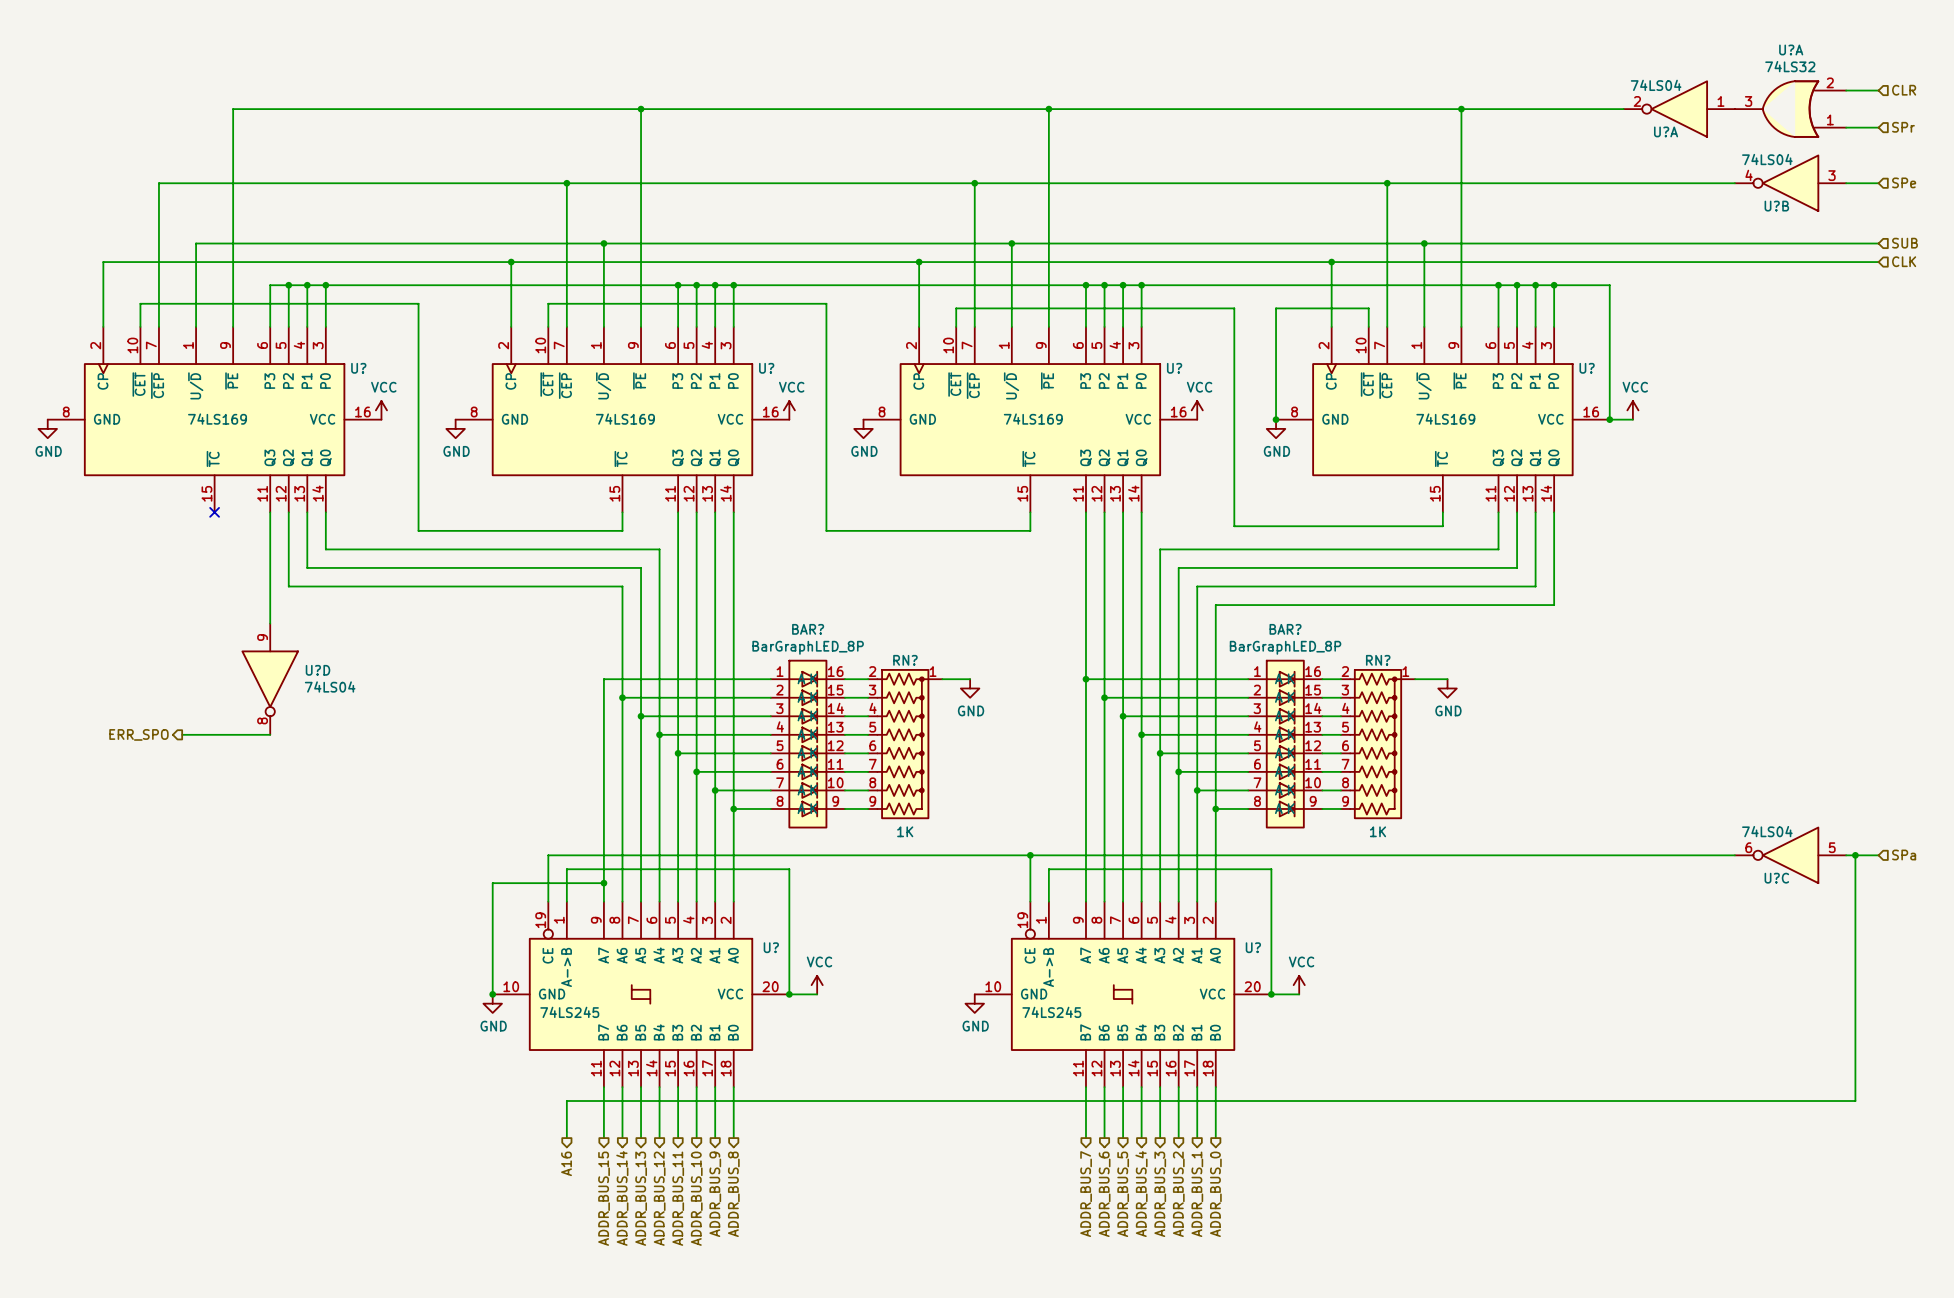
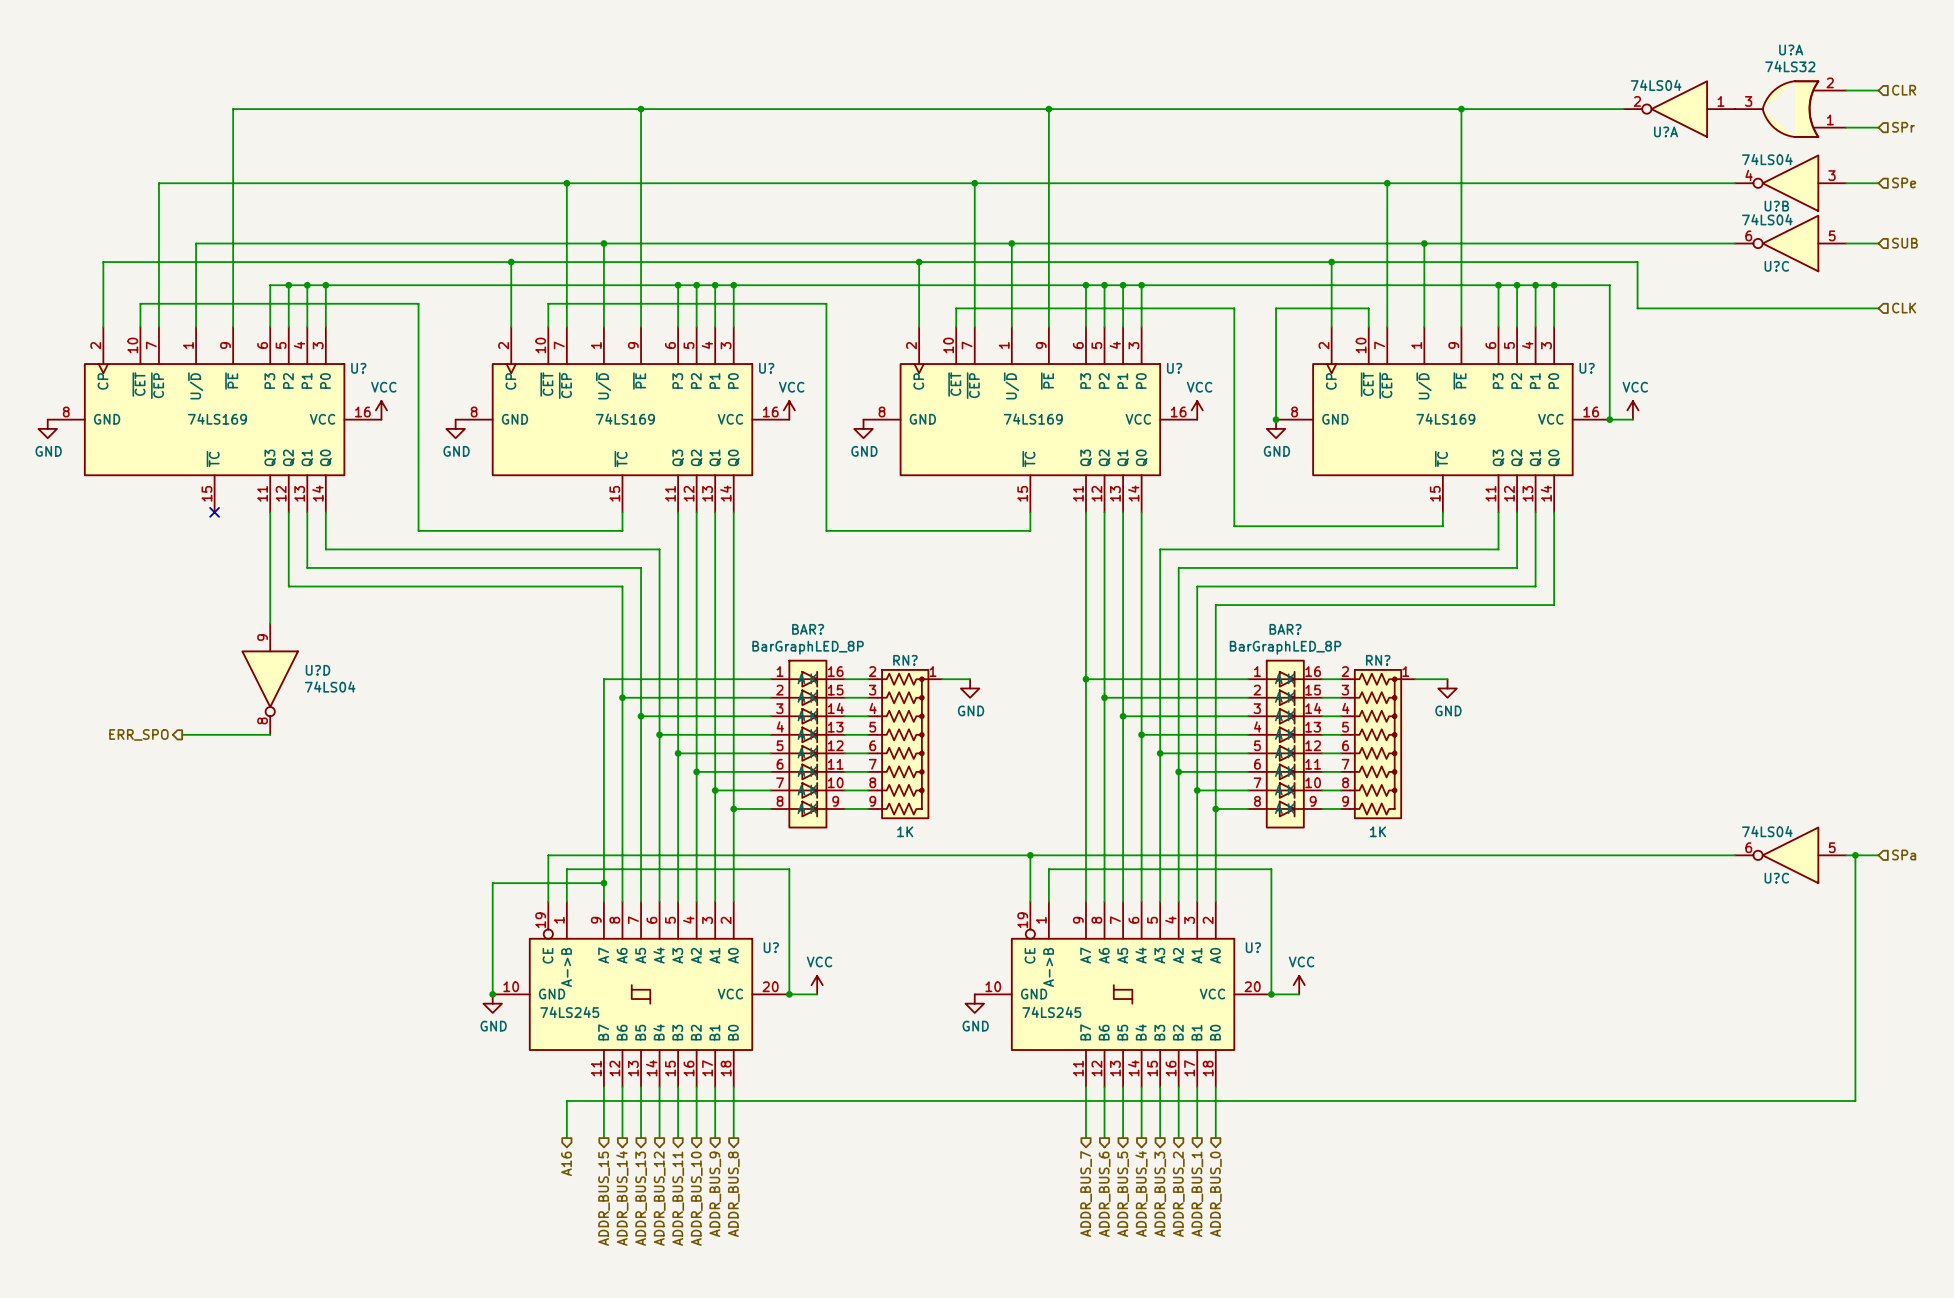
U?C: none -> 74LS04 (1790, 243)
hierarchical label position: CLK (1904, 261) -> CLK (1904, 308)
wire: (1637, 262) (1878, 262) -> (1637, 262) (1637, 308) (1878, 308)

